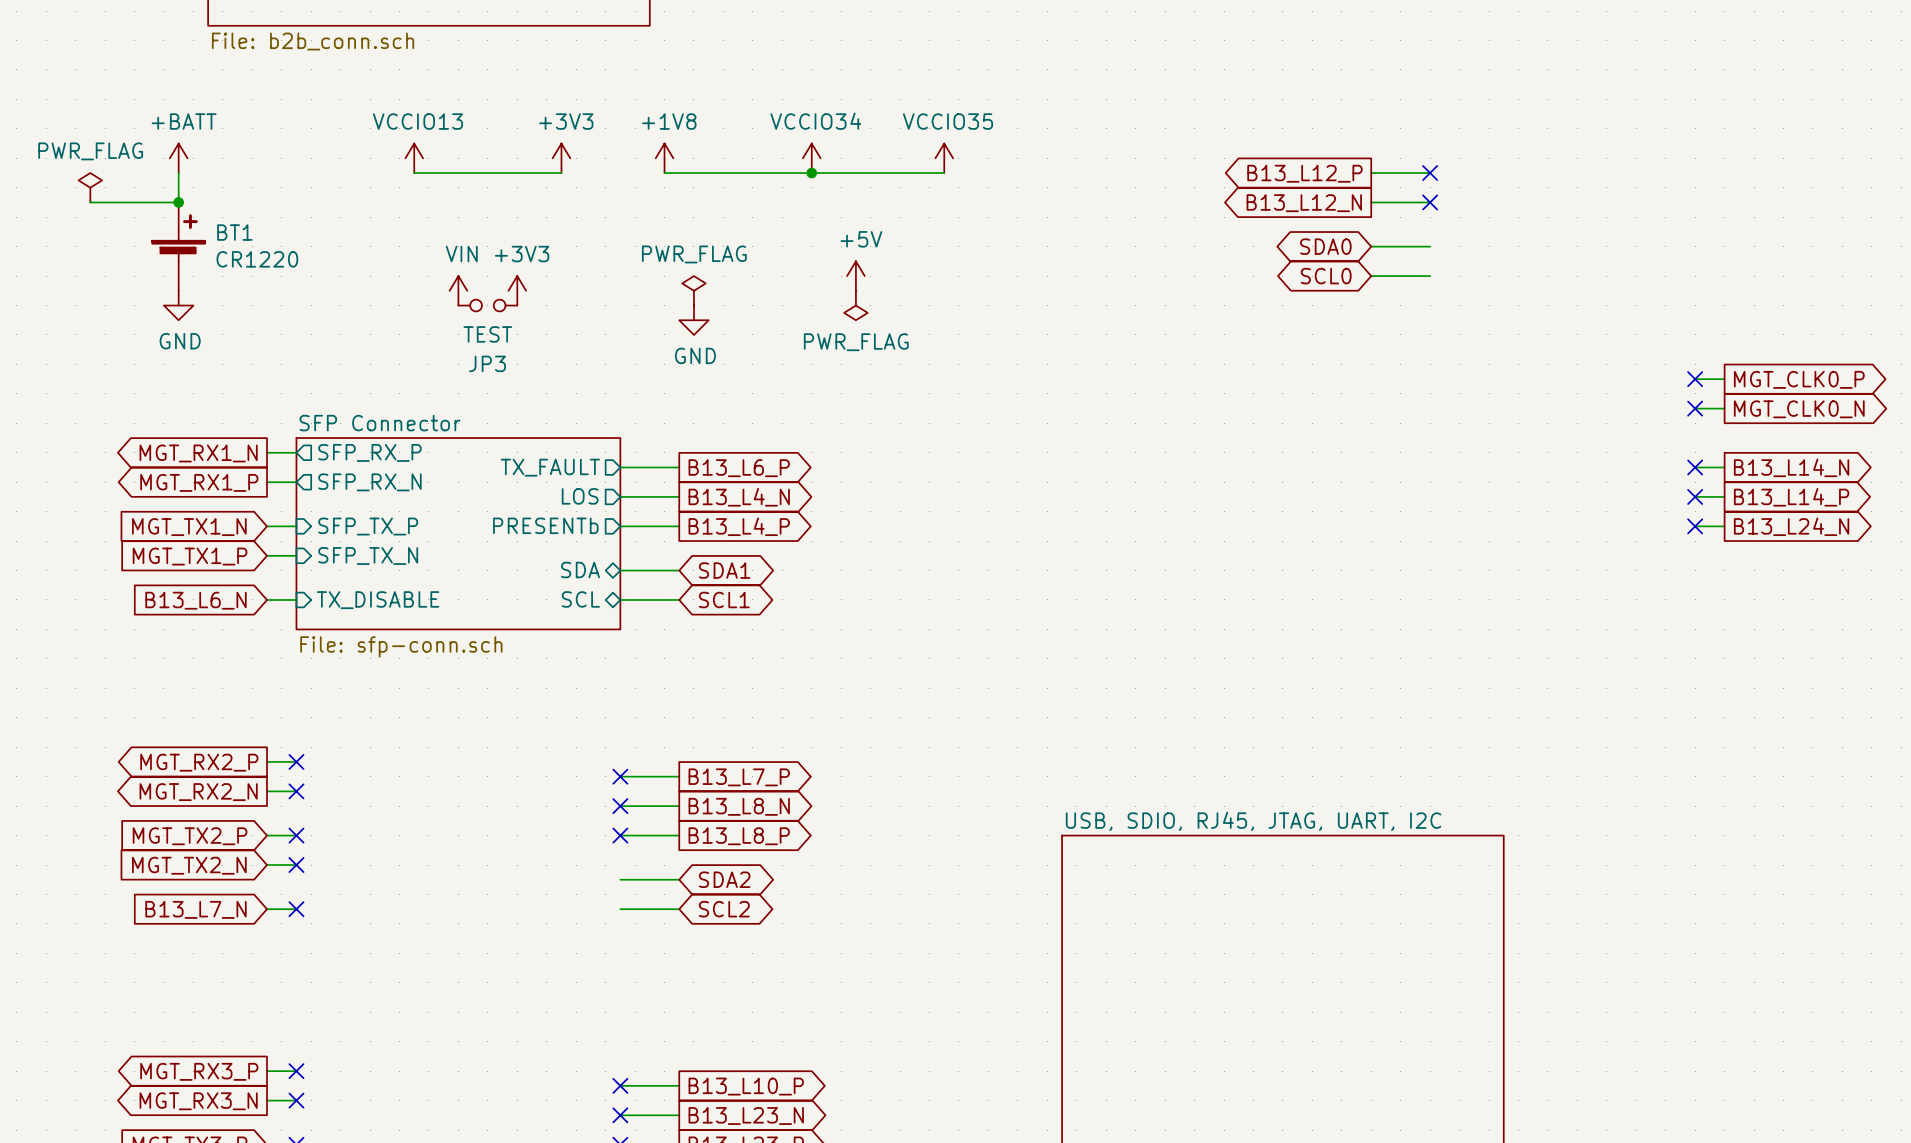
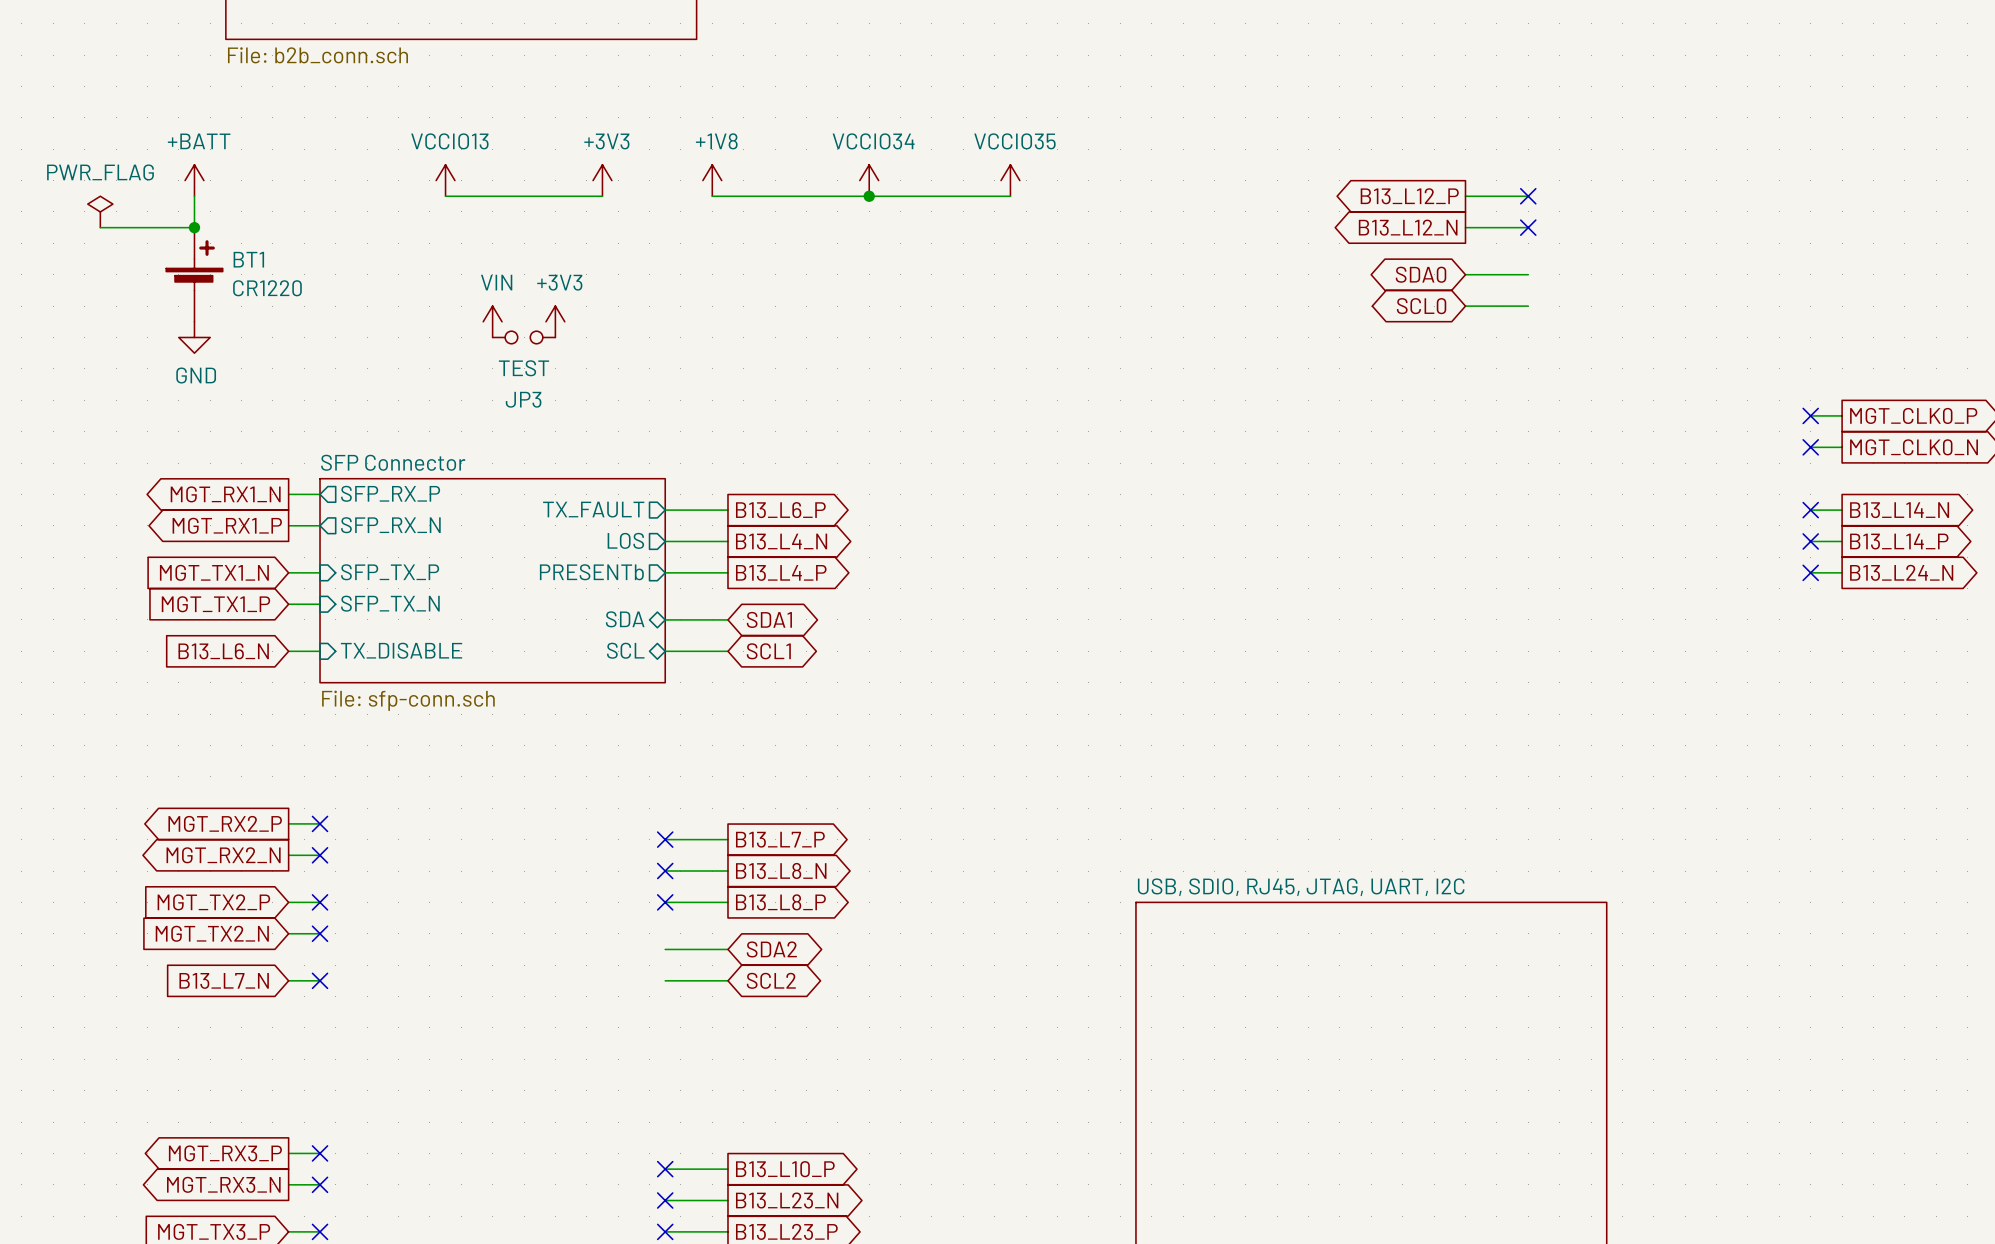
power symbol: +5V (855, 276) -> none
power symbol: PWR_FLAG (693, 290) -> none
power symbol: PWR_FLAG (855, 305) -> none
power symbol: GND (693, 320) -> none

